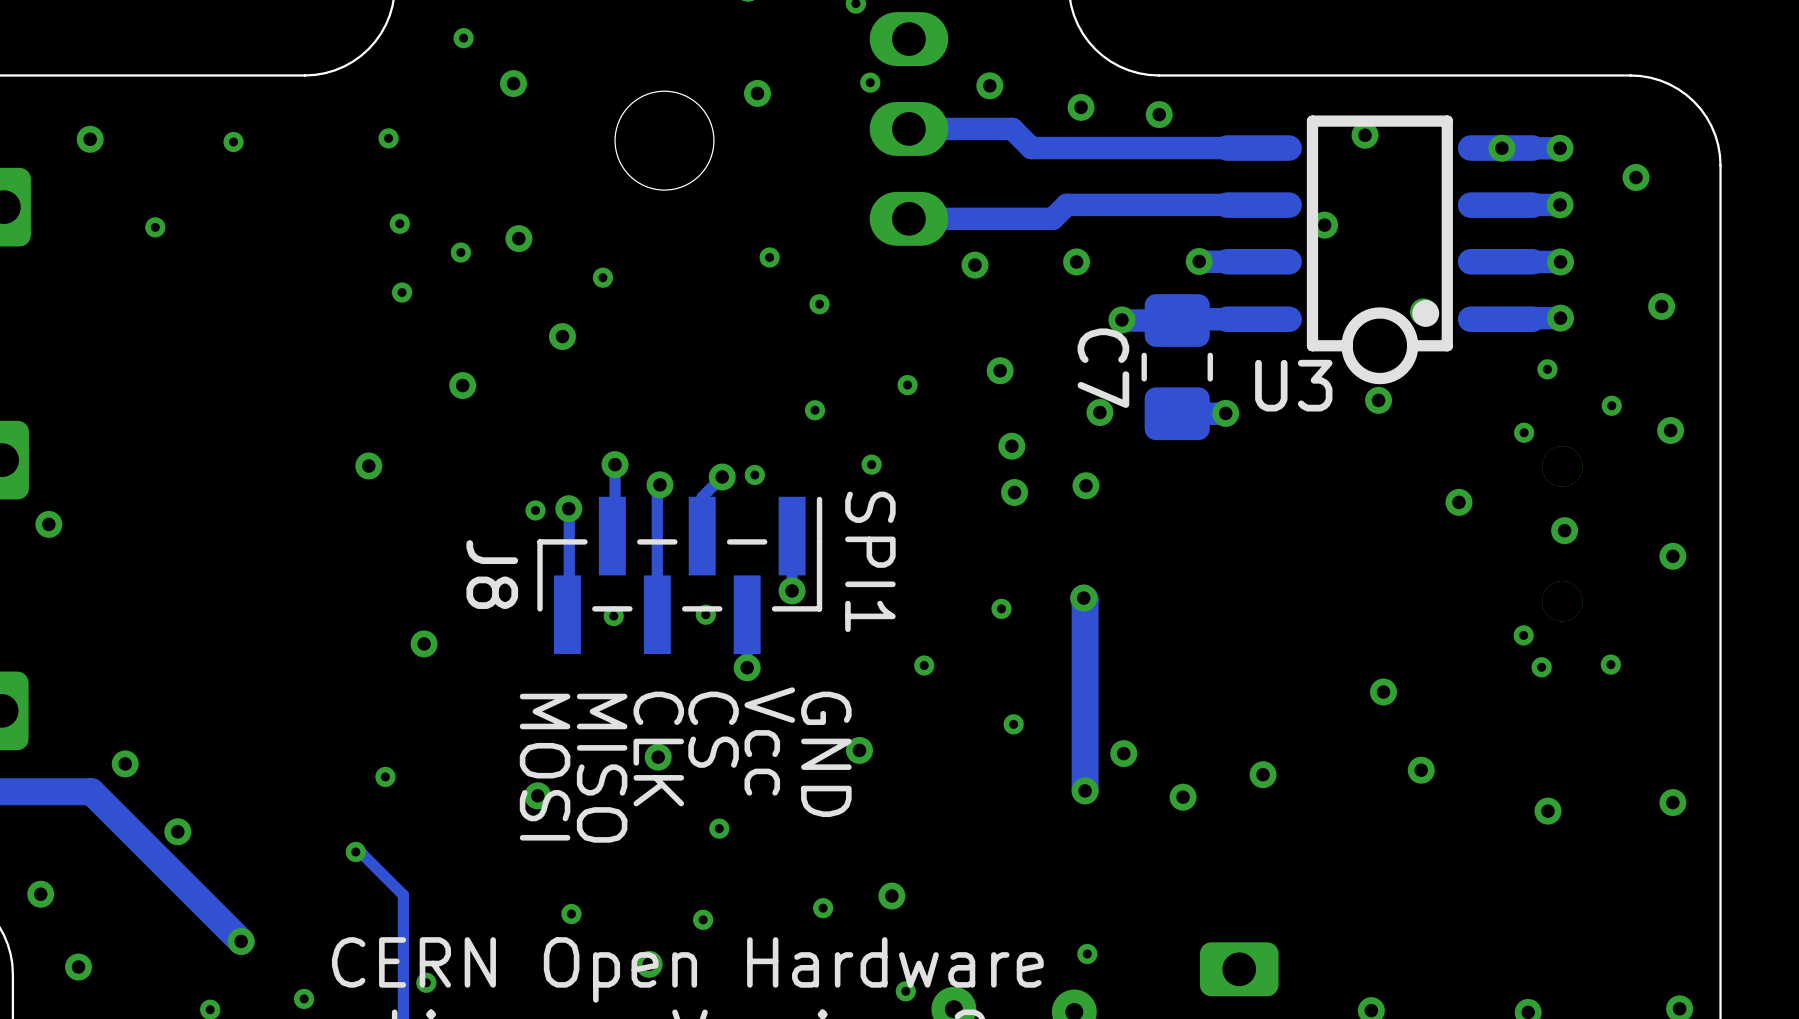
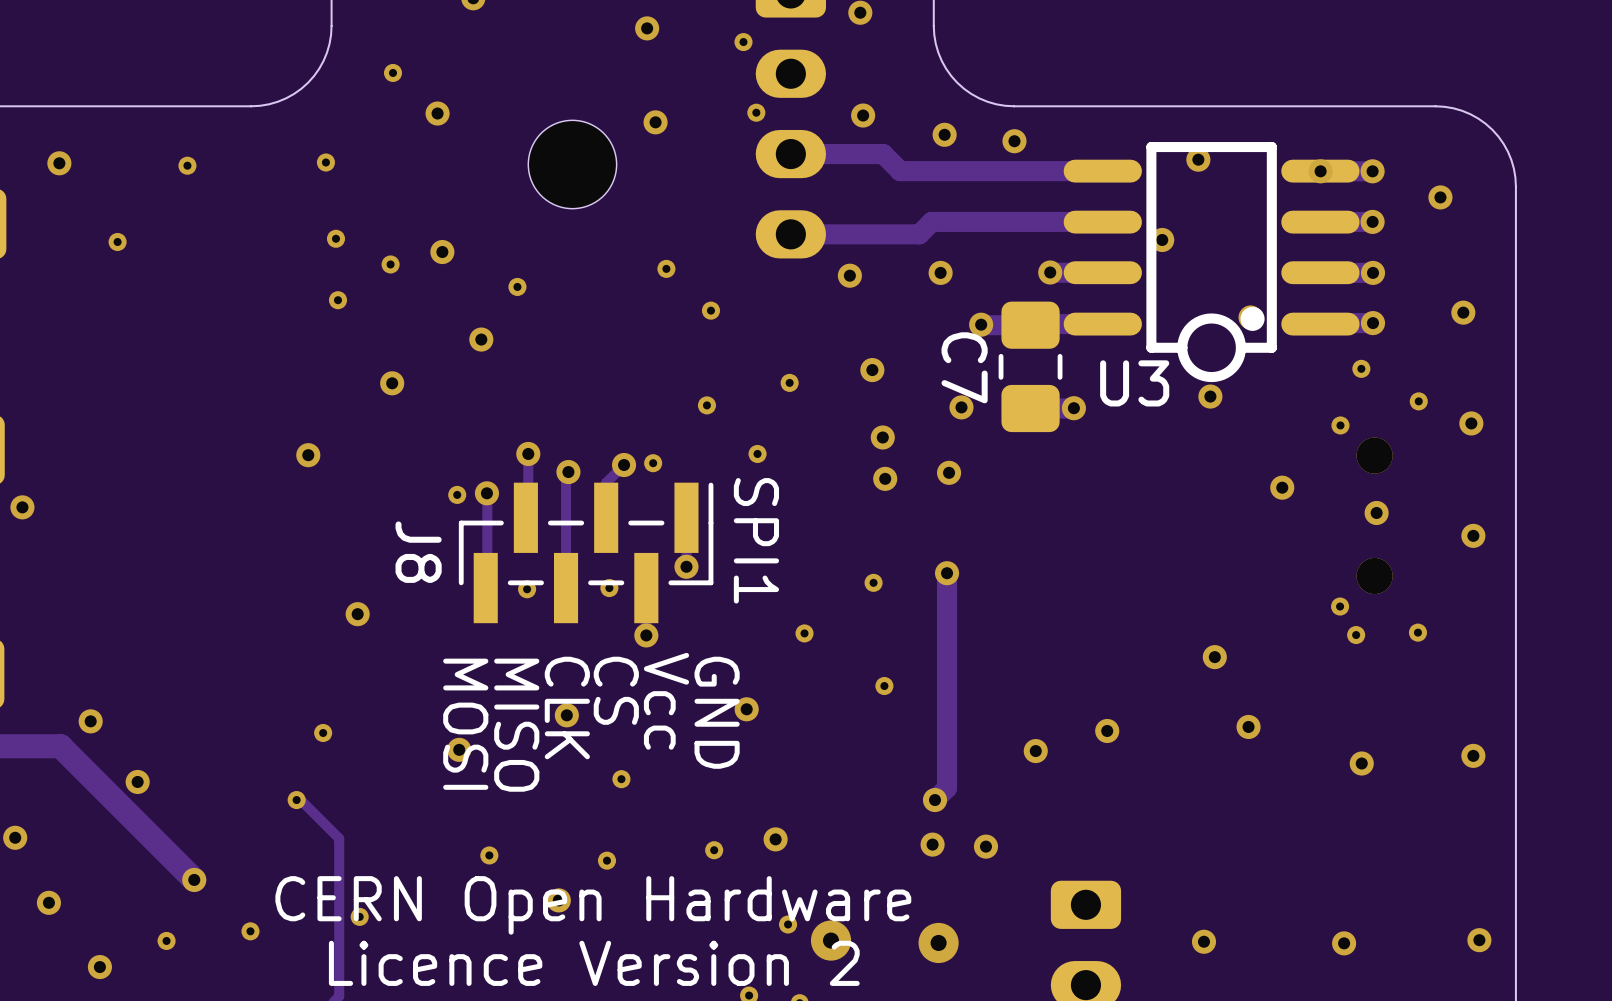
track: (1083, 598) (1085, 790) -> (947, 573) (947, 787) (934, 800) (937, 800)
via: (1123, 753) -> none
via: (1085, 790) -> none
via: none -> (934, 800)
via: none -> (932, 844)
via: none -> (985, 846)
via: (1087, 954) -> none

